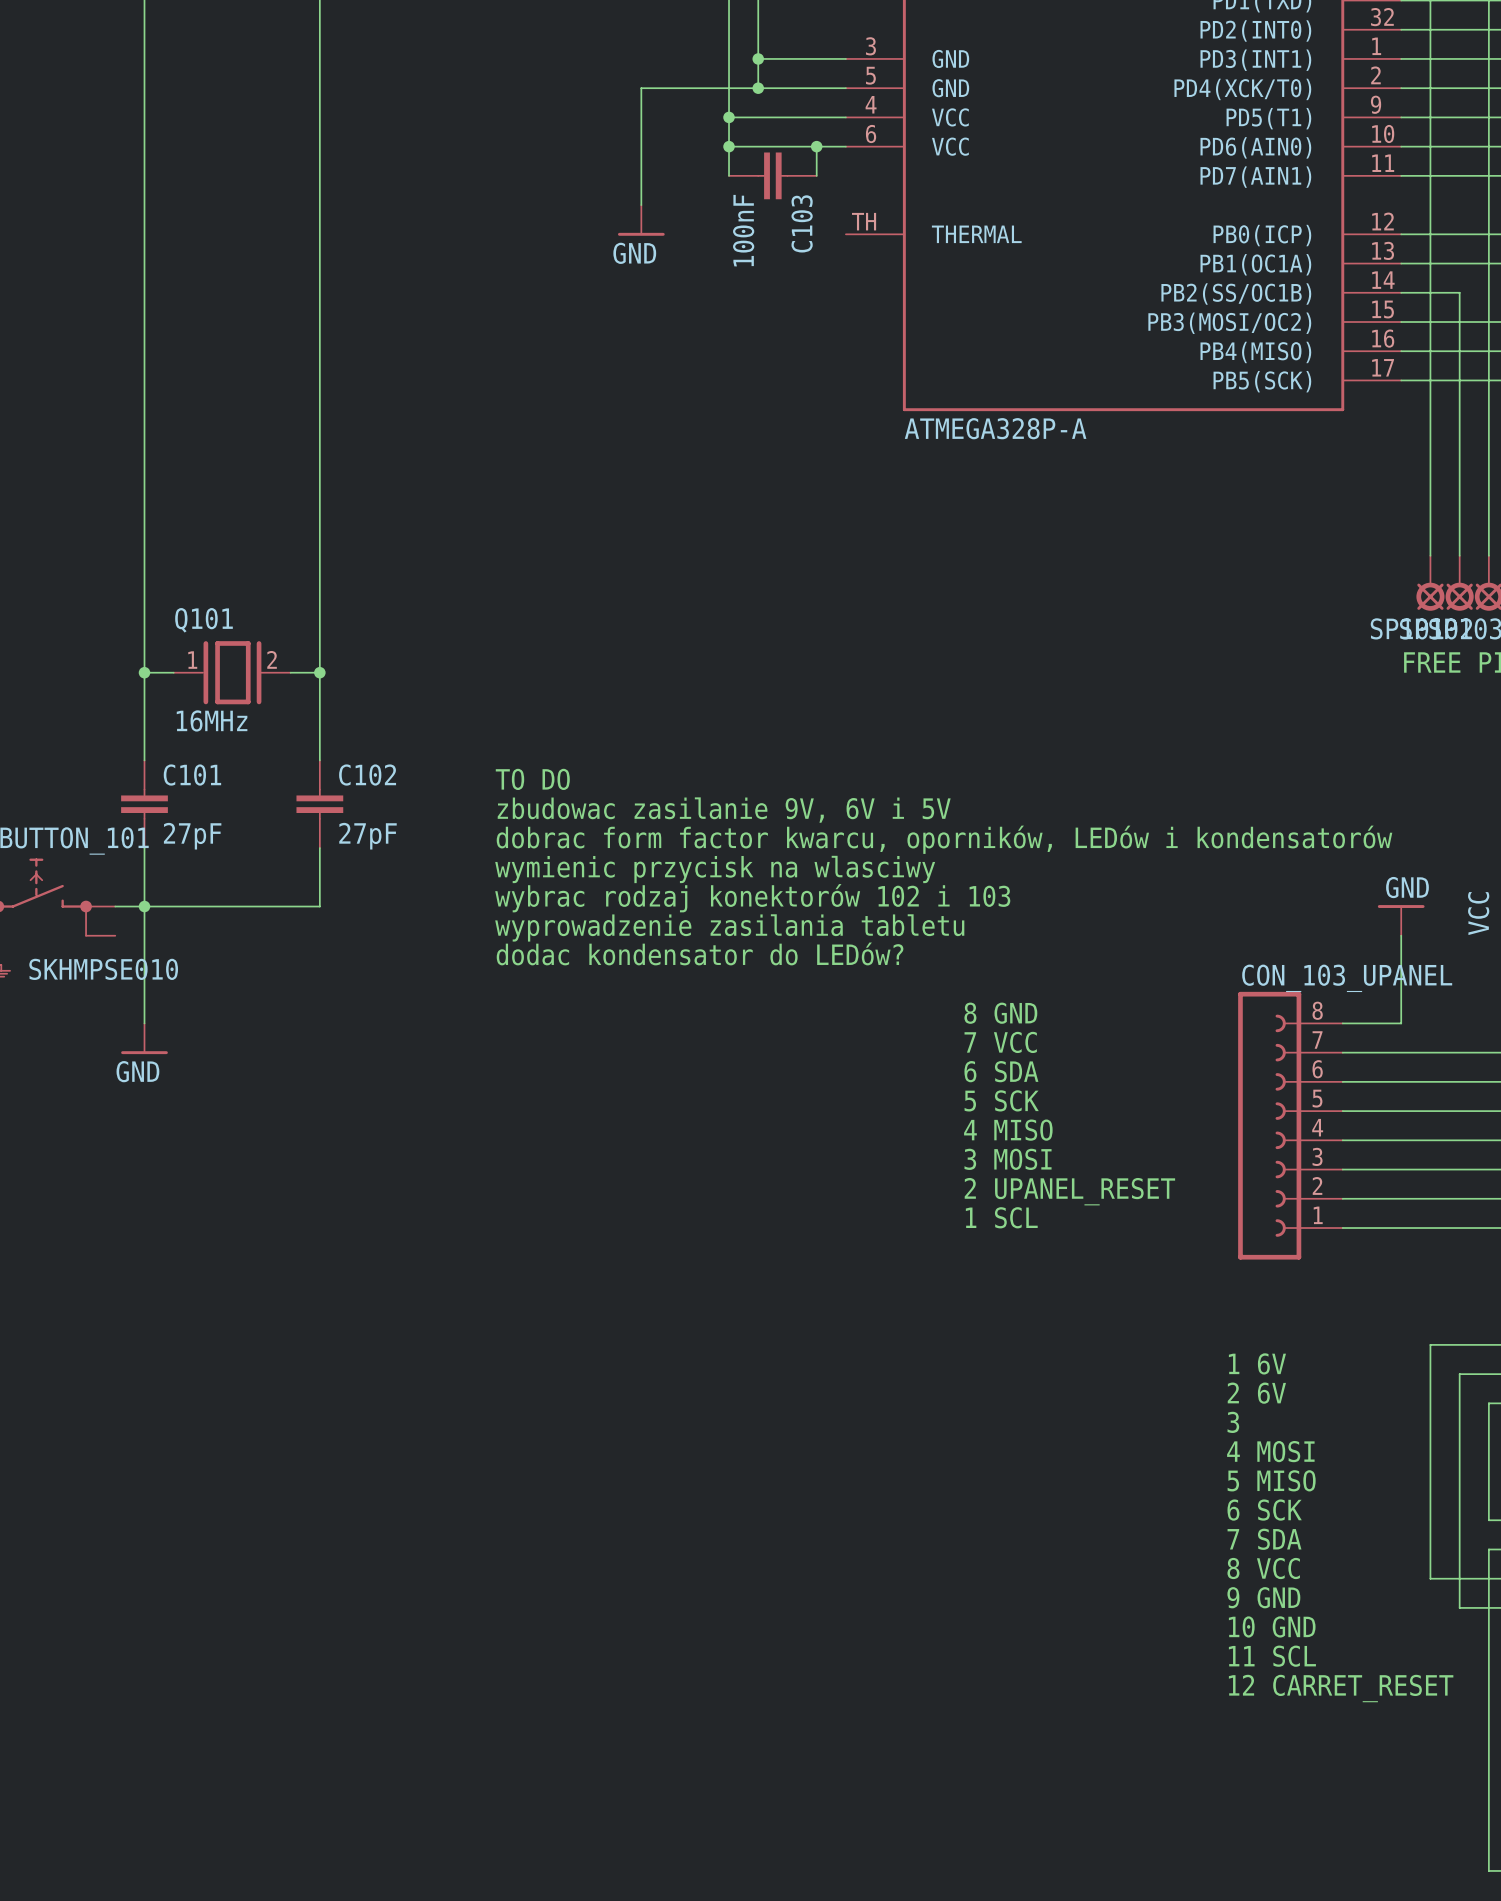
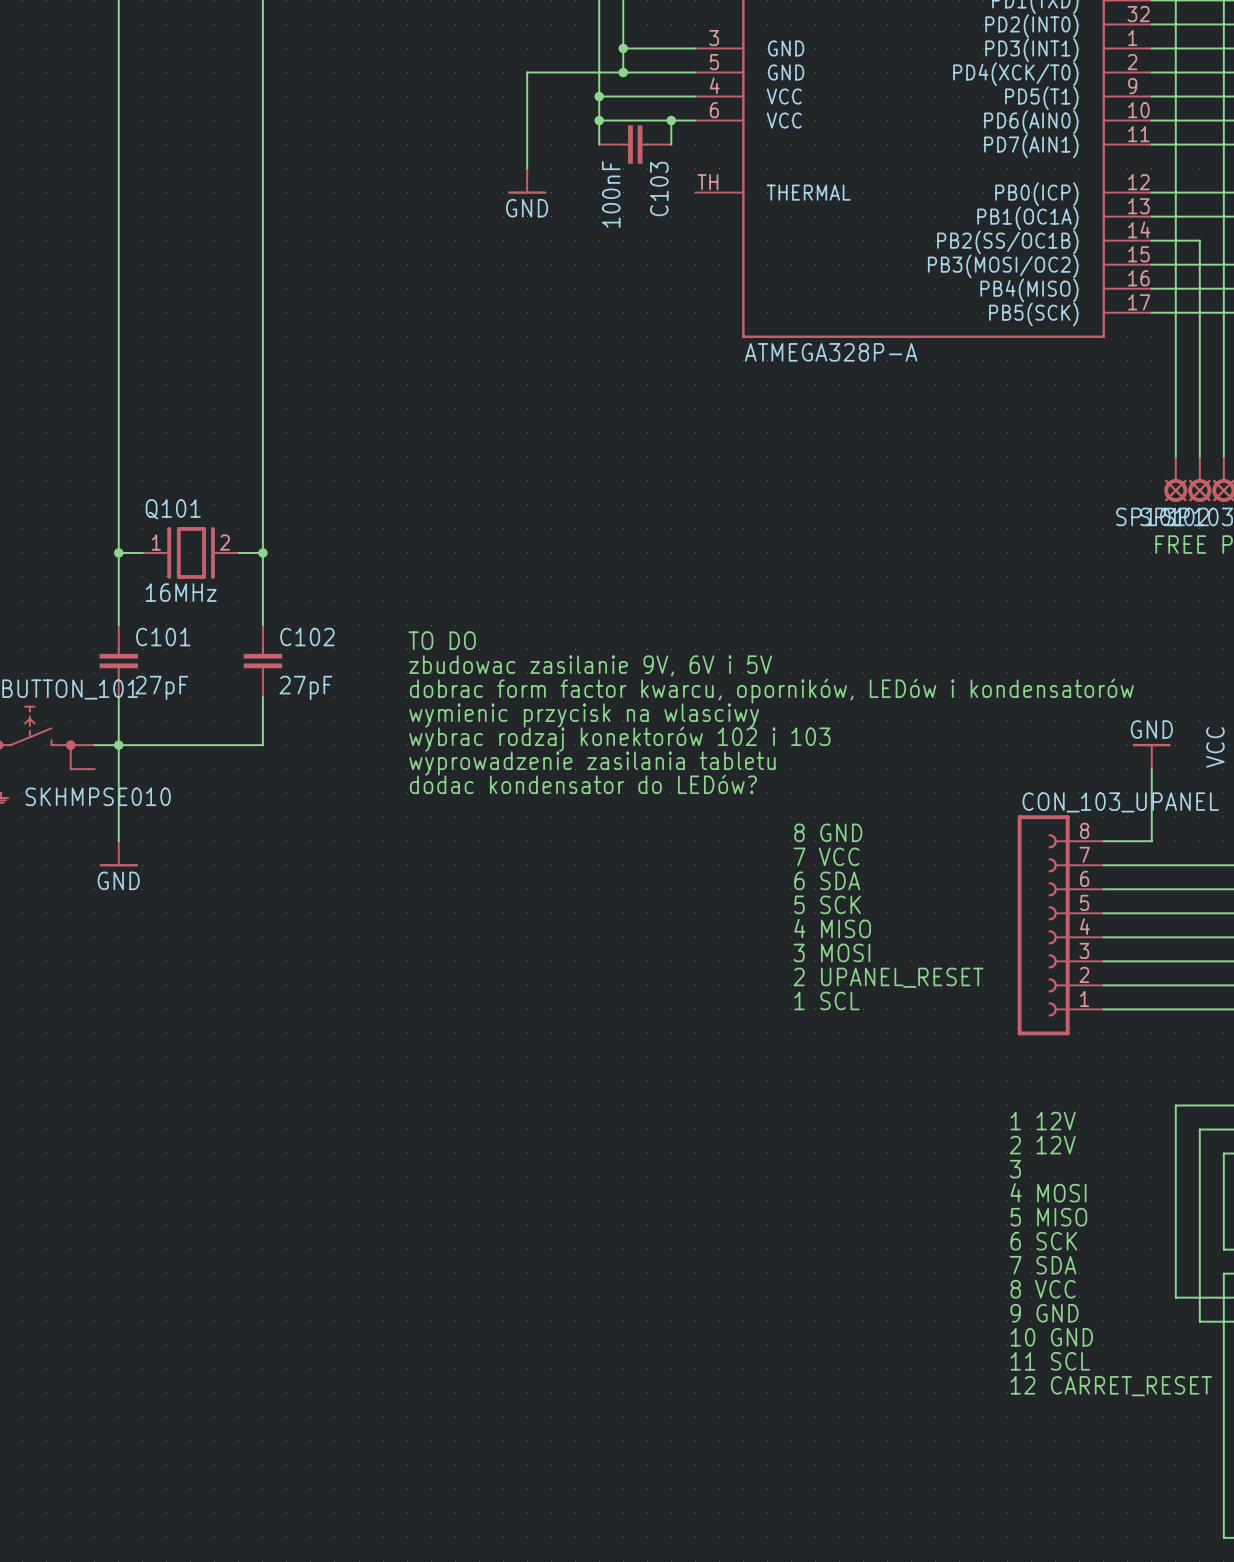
text: 1 6V (1257, 1363) -> 1 12V (1043, 1121)
text: 2 6V (1256, 1393) -> 2 12V (1042, 1145)

